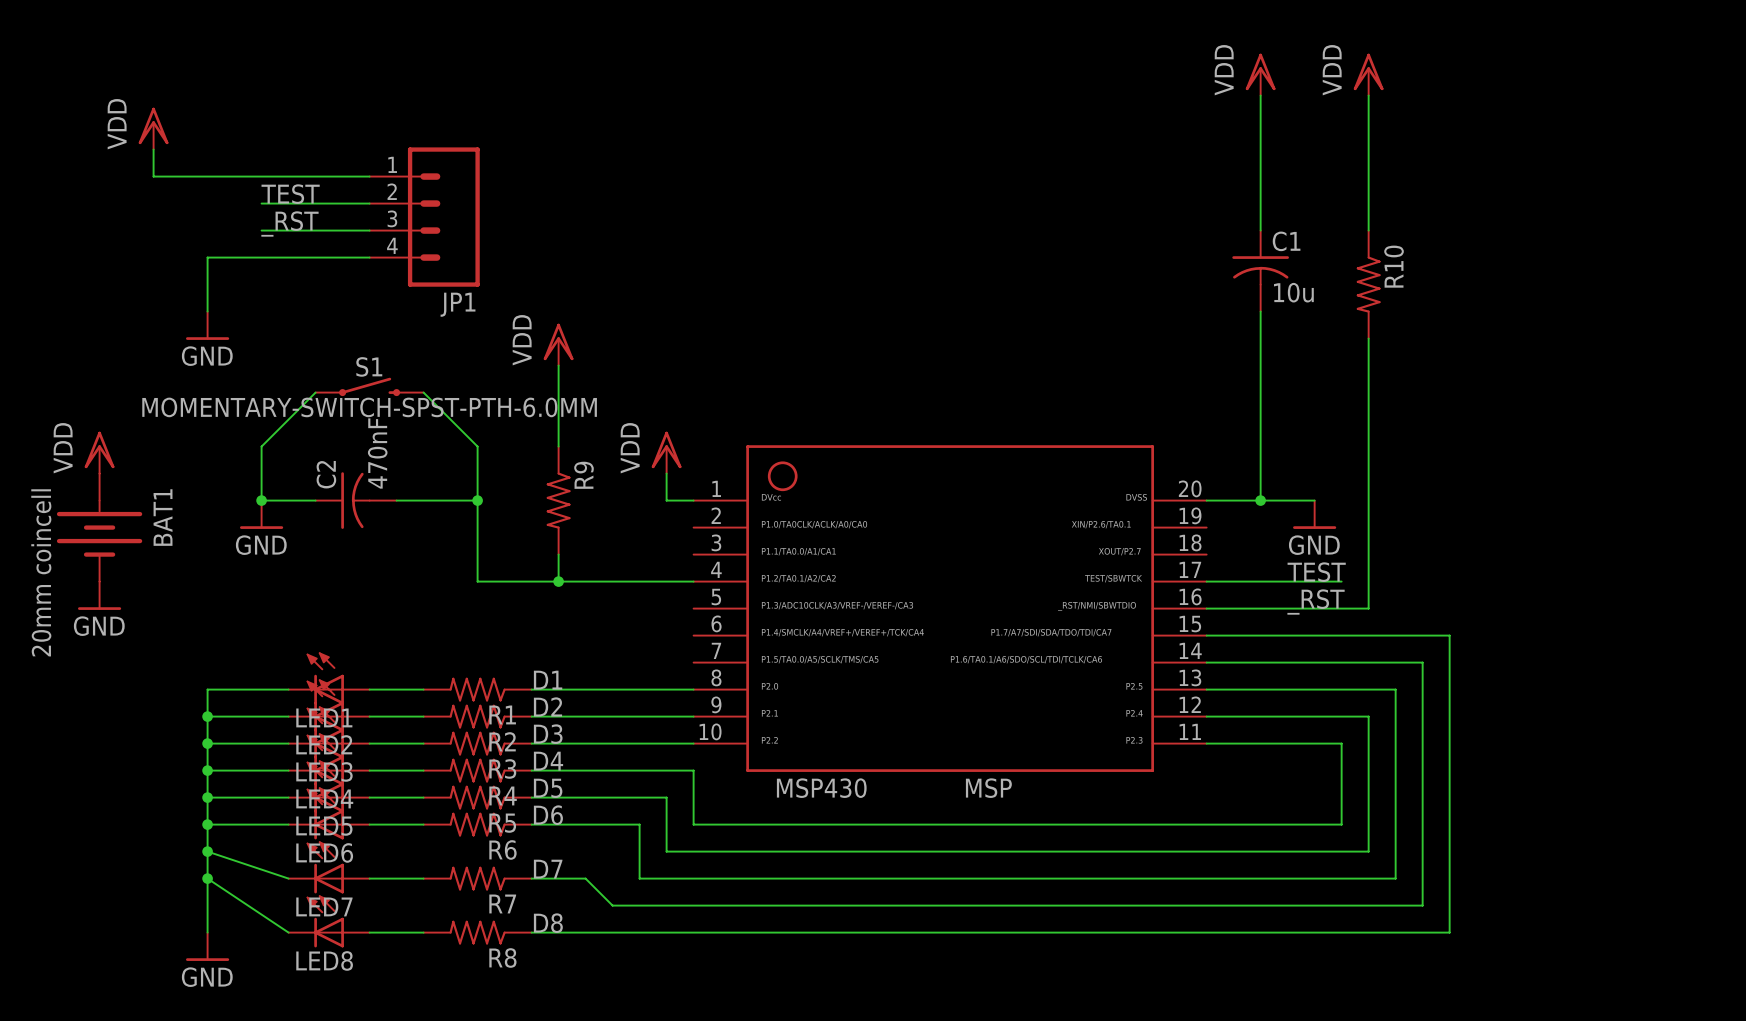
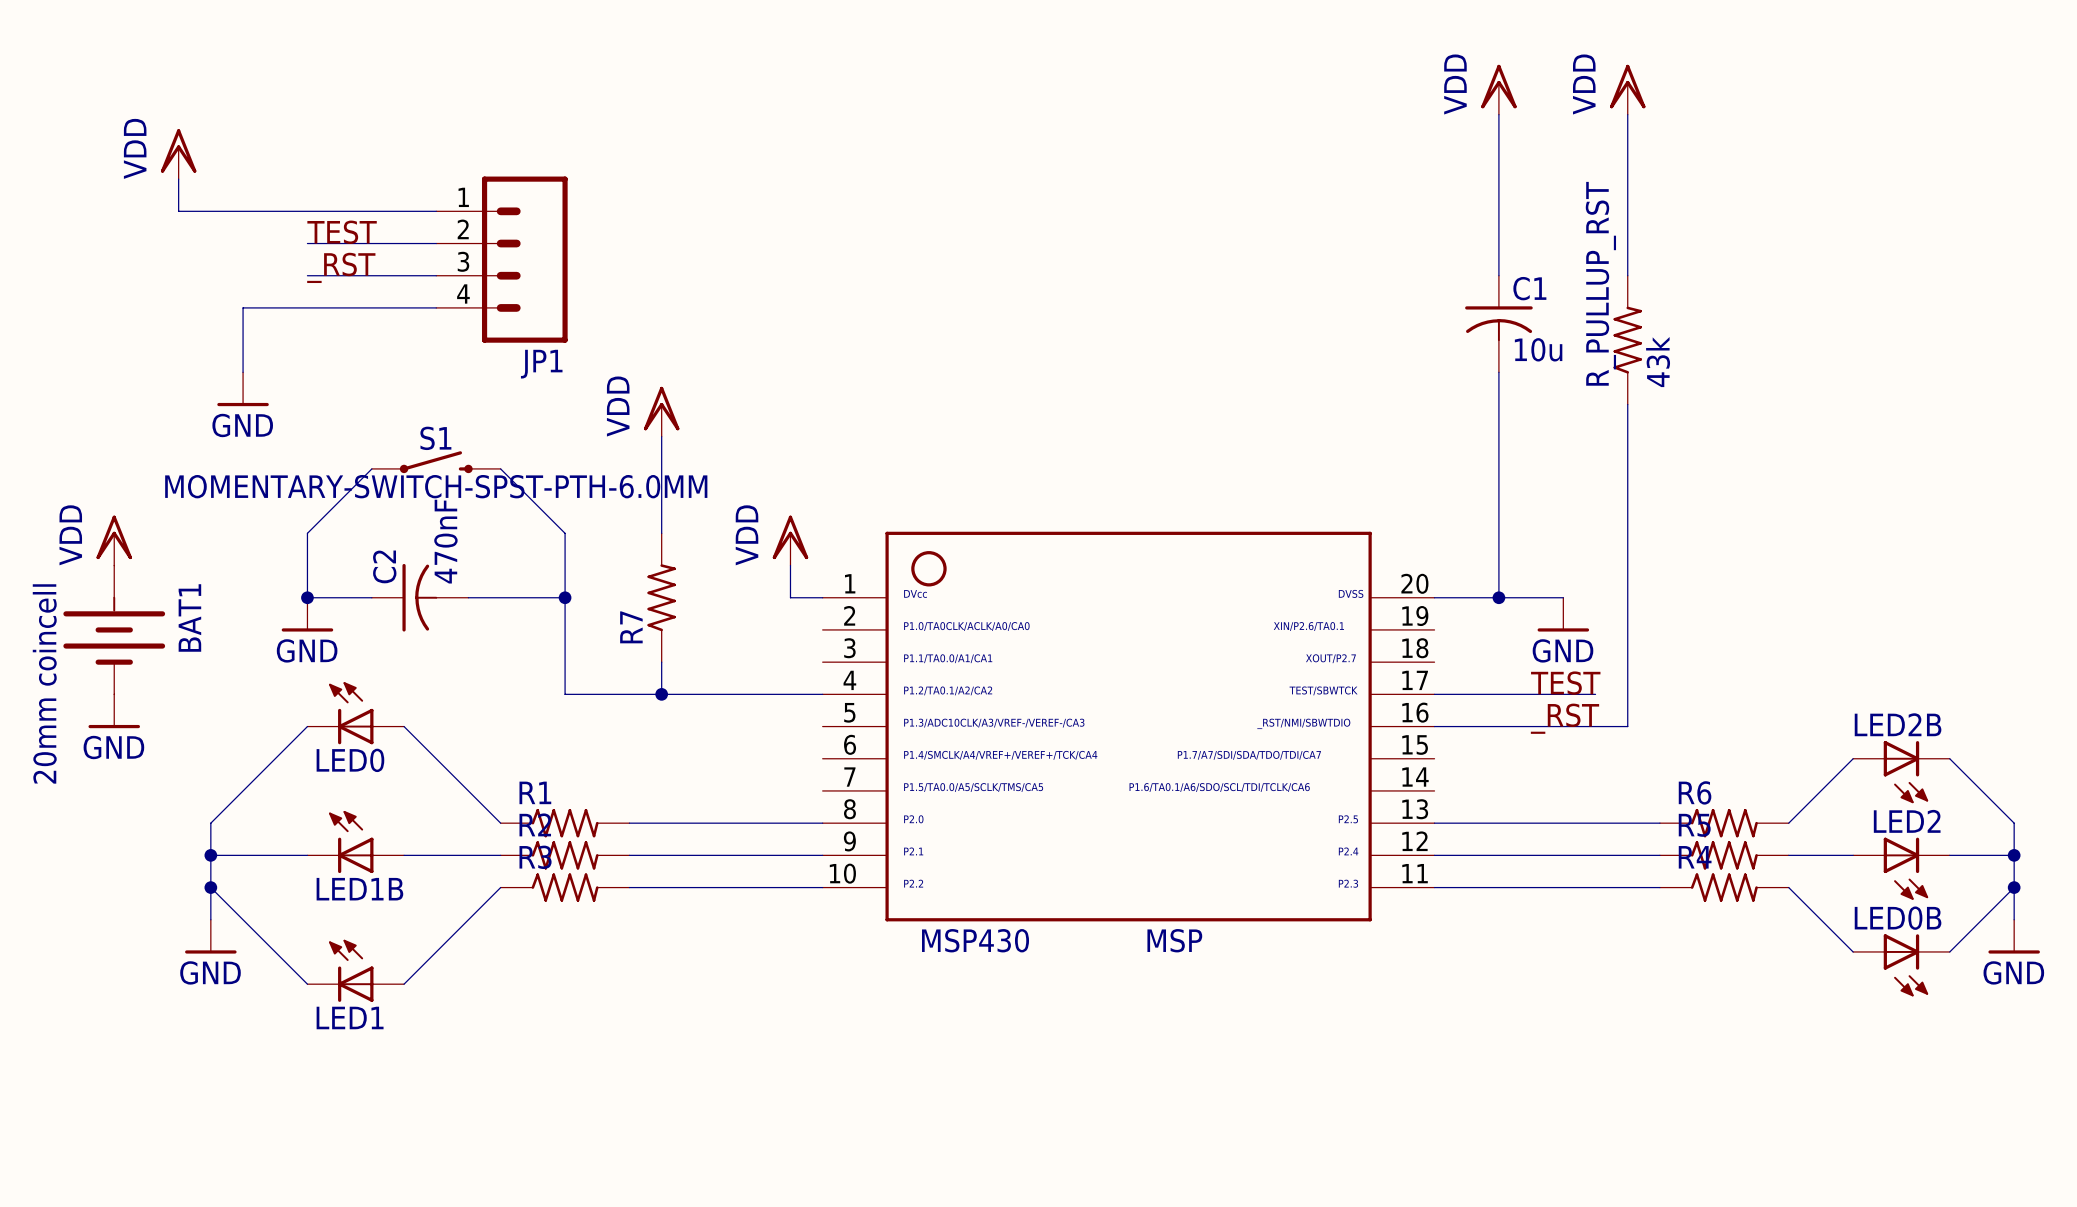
R10: (1368, 284) -> none
R_PULLUP_RST: none -> 43k (1627, 340)
R9: (558, 500) -> none
LED0: none -> (355, 713)
wire: none -> (307, 726) (210, 823) (210, 919)
wire: (1206, 635) (1449, 635) (1449, 932) (531, 932) -> none
wire: none -> (1853, 758) (1788, 823)
wire: none -> (1949, 758) (2014, 823) (2014, 919)
LED2B: none -> (1901, 772)
wire: (1206, 662) (1422, 662) (1422, 905) (612, 905) (585, 878) (531, 878) -> none
LED1 position: (329, 678) -> (355, 970)
label: D1 (548, 680) -> none
wire: (288, 689) (207, 689) (207, 932) -> none
wire: (369, 689) (423, 689) -> (404, 726) (500, 823)
R1 rotation: 0° (477, 689) -> 180° (565, 823)
wire: (1395, 689) (1395, 878) (639, 878) (639, 824) (531, 824) -> none
LED1B: none -> (355, 842)
LED2 rotation: 0° (325, 705) -> 180° (1905, 868)
LED2 position: (329, 705) -> (1901, 868)
label: D2 (547, 706) -> none
wire: none -> (210, 855) (243, 855)
junction: none -> (210, 855)
junction: (207, 716) -> none
R2 rotation: 0° (477, 716) -> 180° (565, 855)
wire: (1368, 716) (1368, 851) (666, 851) (666, 797) (531, 797) -> (1627, 855) (1659, 855)
wire: none -> (1788, 855) (1853, 855)
wire: none -> (1949, 855) (2014, 855)
junction: none -> (2014, 855)
LED3: (329, 732) -> none
label: D3 (548, 734) -> none
wire: none -> (210, 887) (307, 984)
junction: none -> (210, 887)
wire: (207, 743) (288, 743) -> none
junction: (207, 743) -> none
wire: (369, 743) (423, 743) -> (404, 984) (500, 887)
R3 rotation: 0° (477, 743) -> 180° (565, 887)
wire: (1341, 743) (1341, 824) (693, 824) (693, 770) (531, 770) -> (1595, 887) (1659, 887)
wire: none -> (1788, 887) (1853, 951)
wire: none -> (2014, 887) (1949, 951)
junction: none -> (2014, 887)
LED4: (329, 759) -> none
label: D4 (548, 761) -> none
wire: (207, 770) (288, 770) -> none
junction: (207, 770) -> none
wire: (369, 770) (423, 770) -> none
R4 rotation: 0° (477, 770) -> 180° (1724, 887)
R4 position: (477, 770) -> (1724, 887)
power symbol: none -> GND (2014, 936)
LED5: (329, 786) -> none
label: D5 (548, 788) -> none
wire: (207, 797) (288, 797) -> none
junction: (207, 797) -> none
wire: (369, 797) (423, 797) -> none
R5 rotation: 0° (477, 797) -> 180° (1724, 855)
R5 position: (477, 797) -> (1724, 855)
LED0B: none -> (1901, 965)
LED6: (329, 813) -> none
label: D6 (548, 815) -> none
wire: (207, 824) (288, 824) -> none
junction: (207, 824) -> none
wire: (369, 824) (423, 824) -> none
R6 rotation: 0° (477, 824) -> 180° (1724, 823)
R6 position: (477, 824) -> (1724, 823)
wire: (207, 851) (288, 878) -> none
junction: (207, 851) -> none
LED7: (329, 867) -> none
label: D7 (548, 869) -> none
wire: (207, 878) (288, 932) -> none
junction: (207, 878) -> none
wire: (369, 878) (423, 878) -> none
R7 rotation: 0° (477, 878) -> 90° clockwise (661, 597)
R7 position: (477, 878) -> (661, 597)
LED8: (329, 921) -> none
label: D8 (548, 923) -> none
wire: (369, 932) (423, 932) -> none
R8: (477, 932) -> none
power symbol position: GND (207, 946) -> GND (210, 936)

